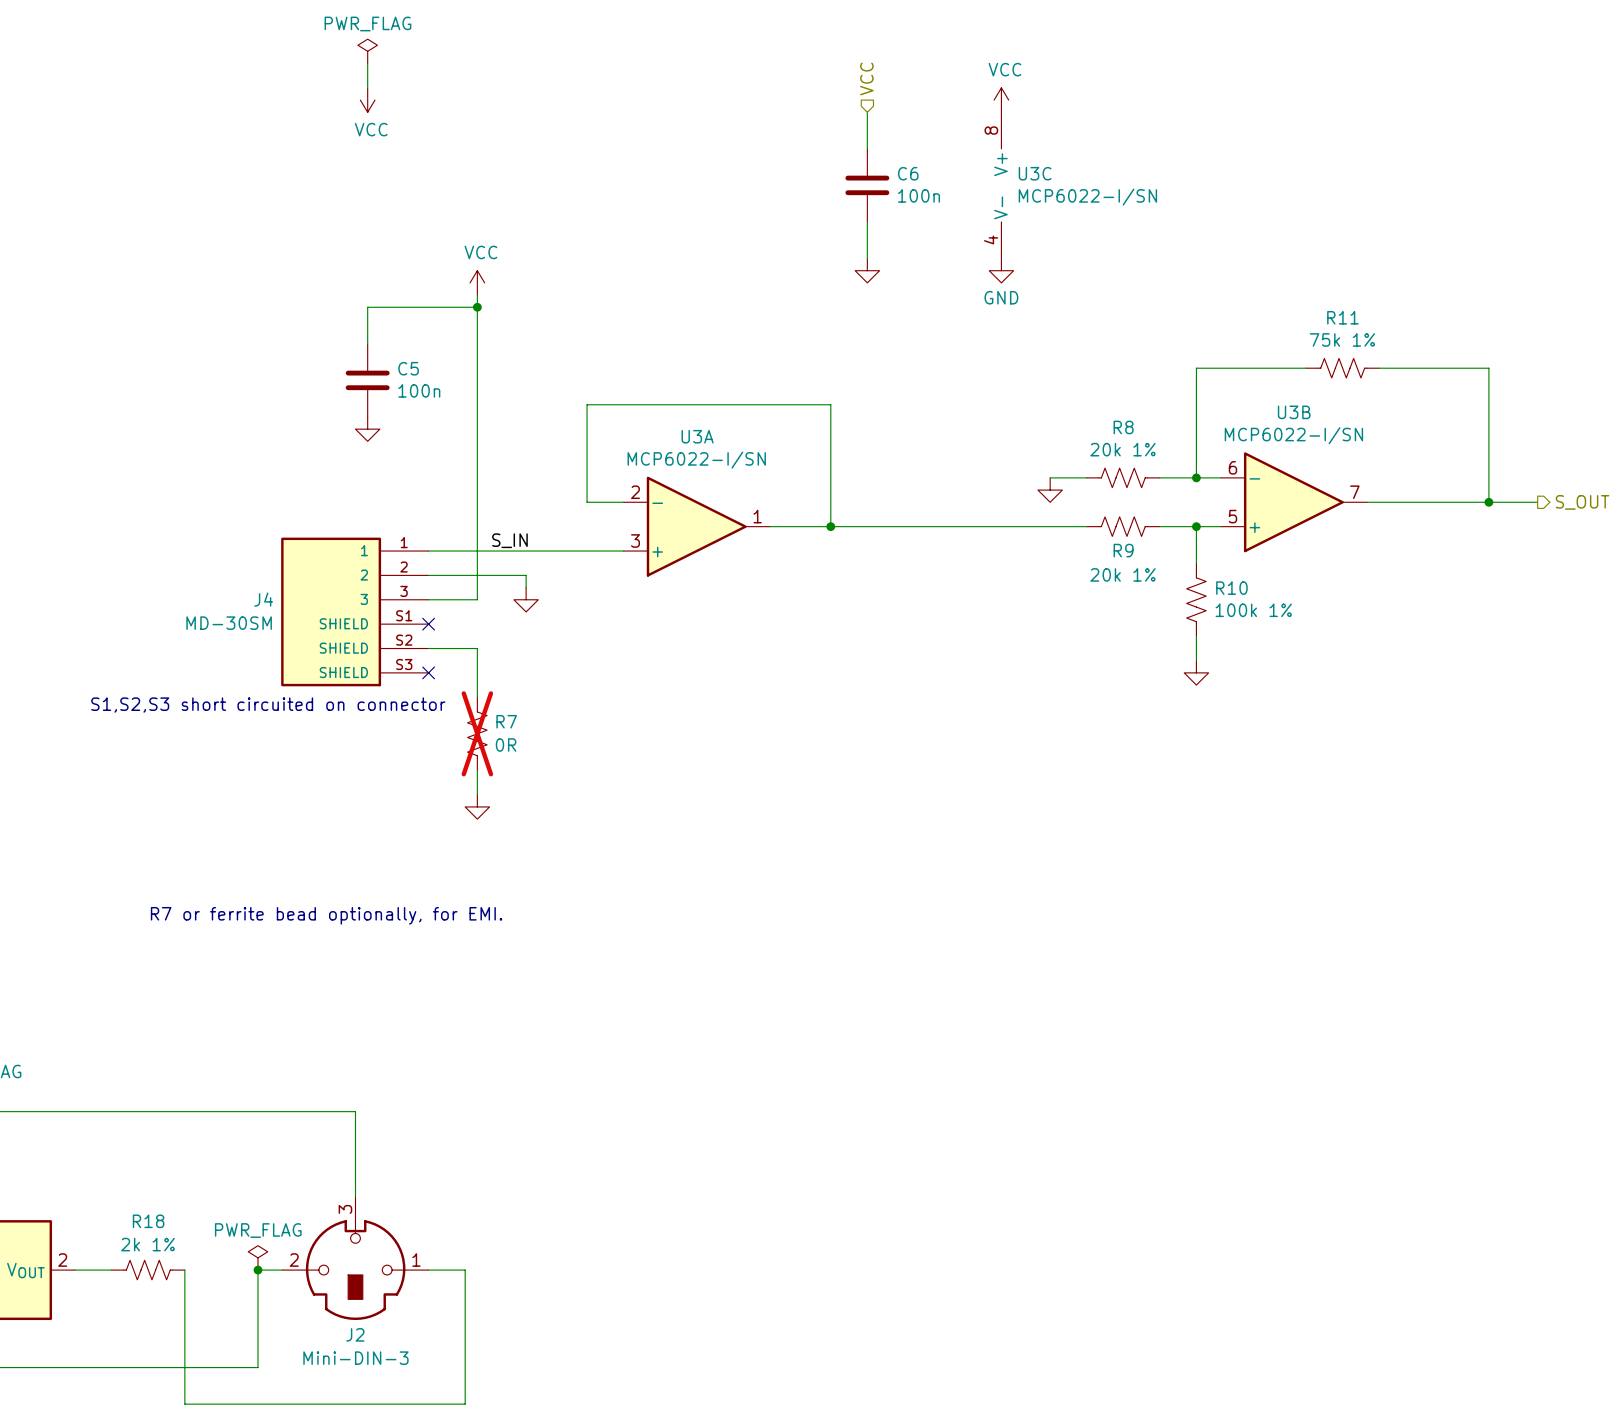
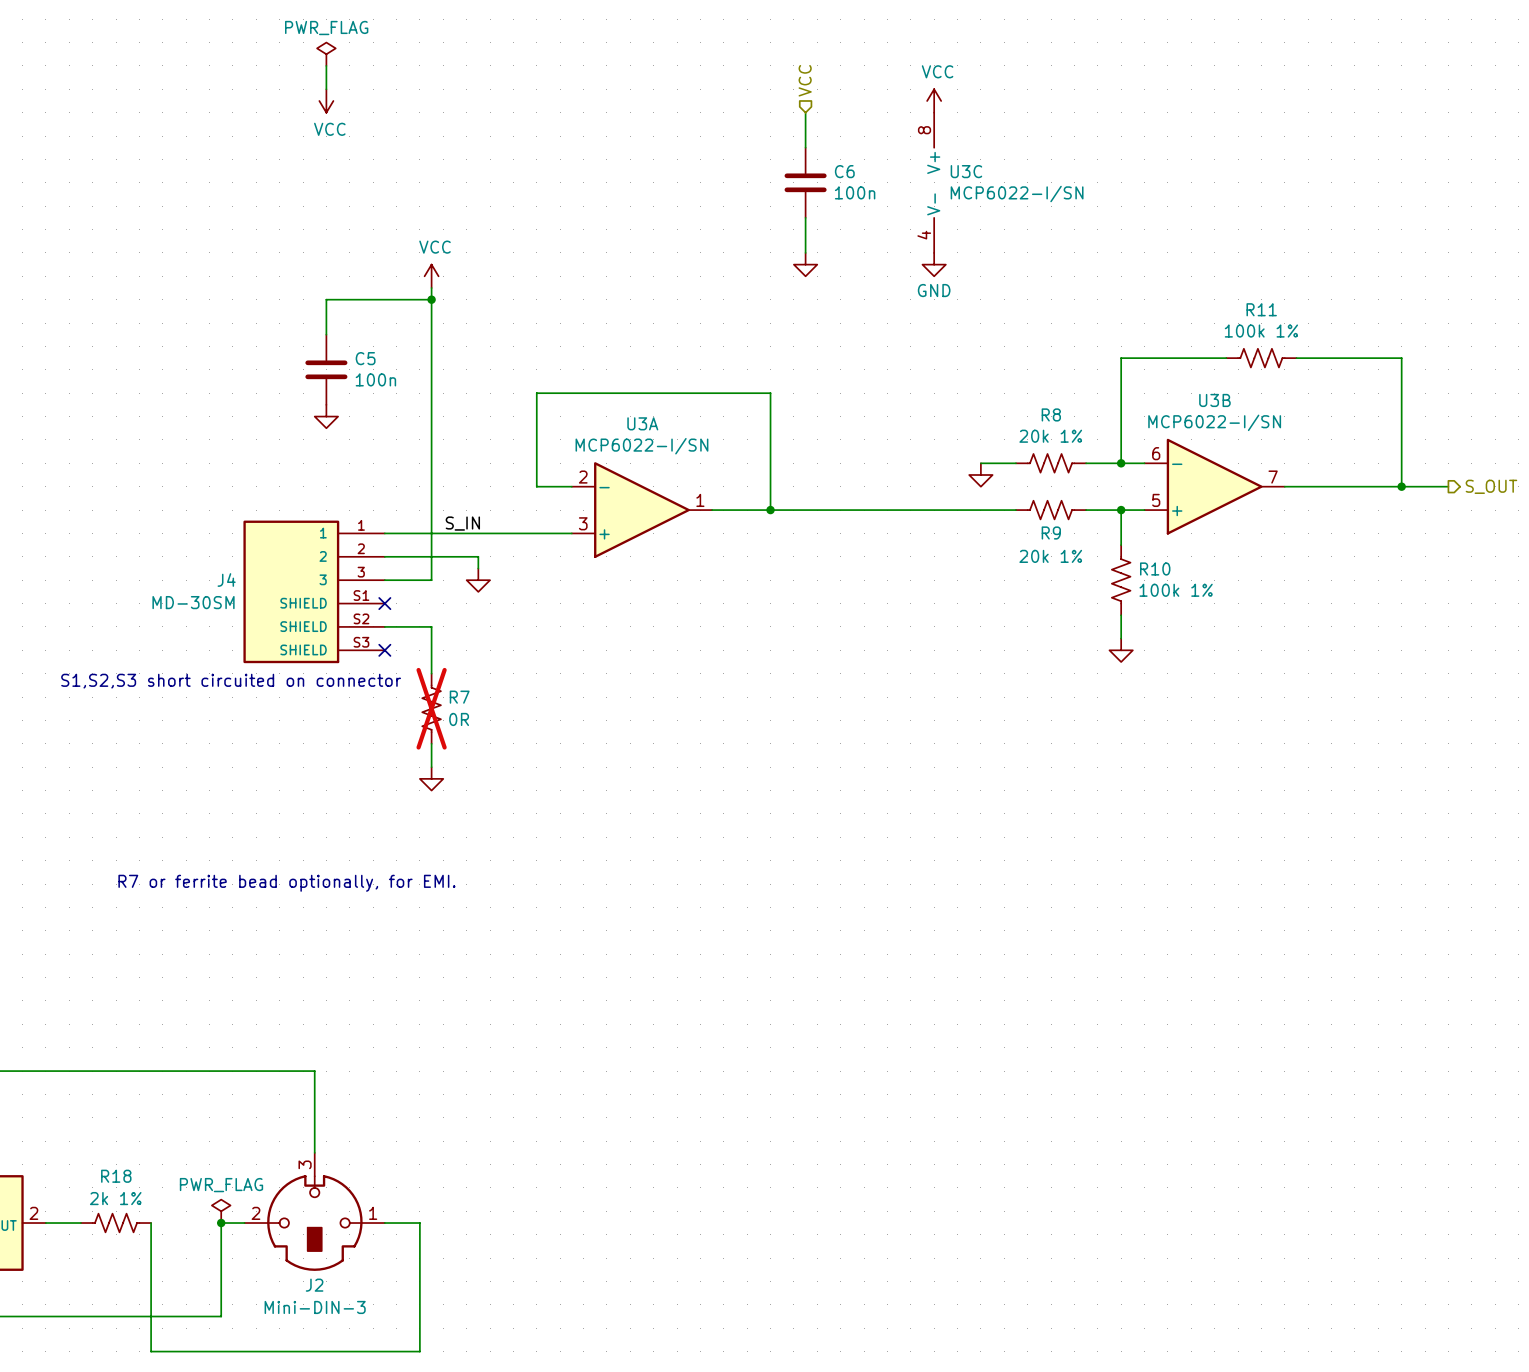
R11 value: 75k 1% (1342, 339) -> 100k 1% (1261, 331)

